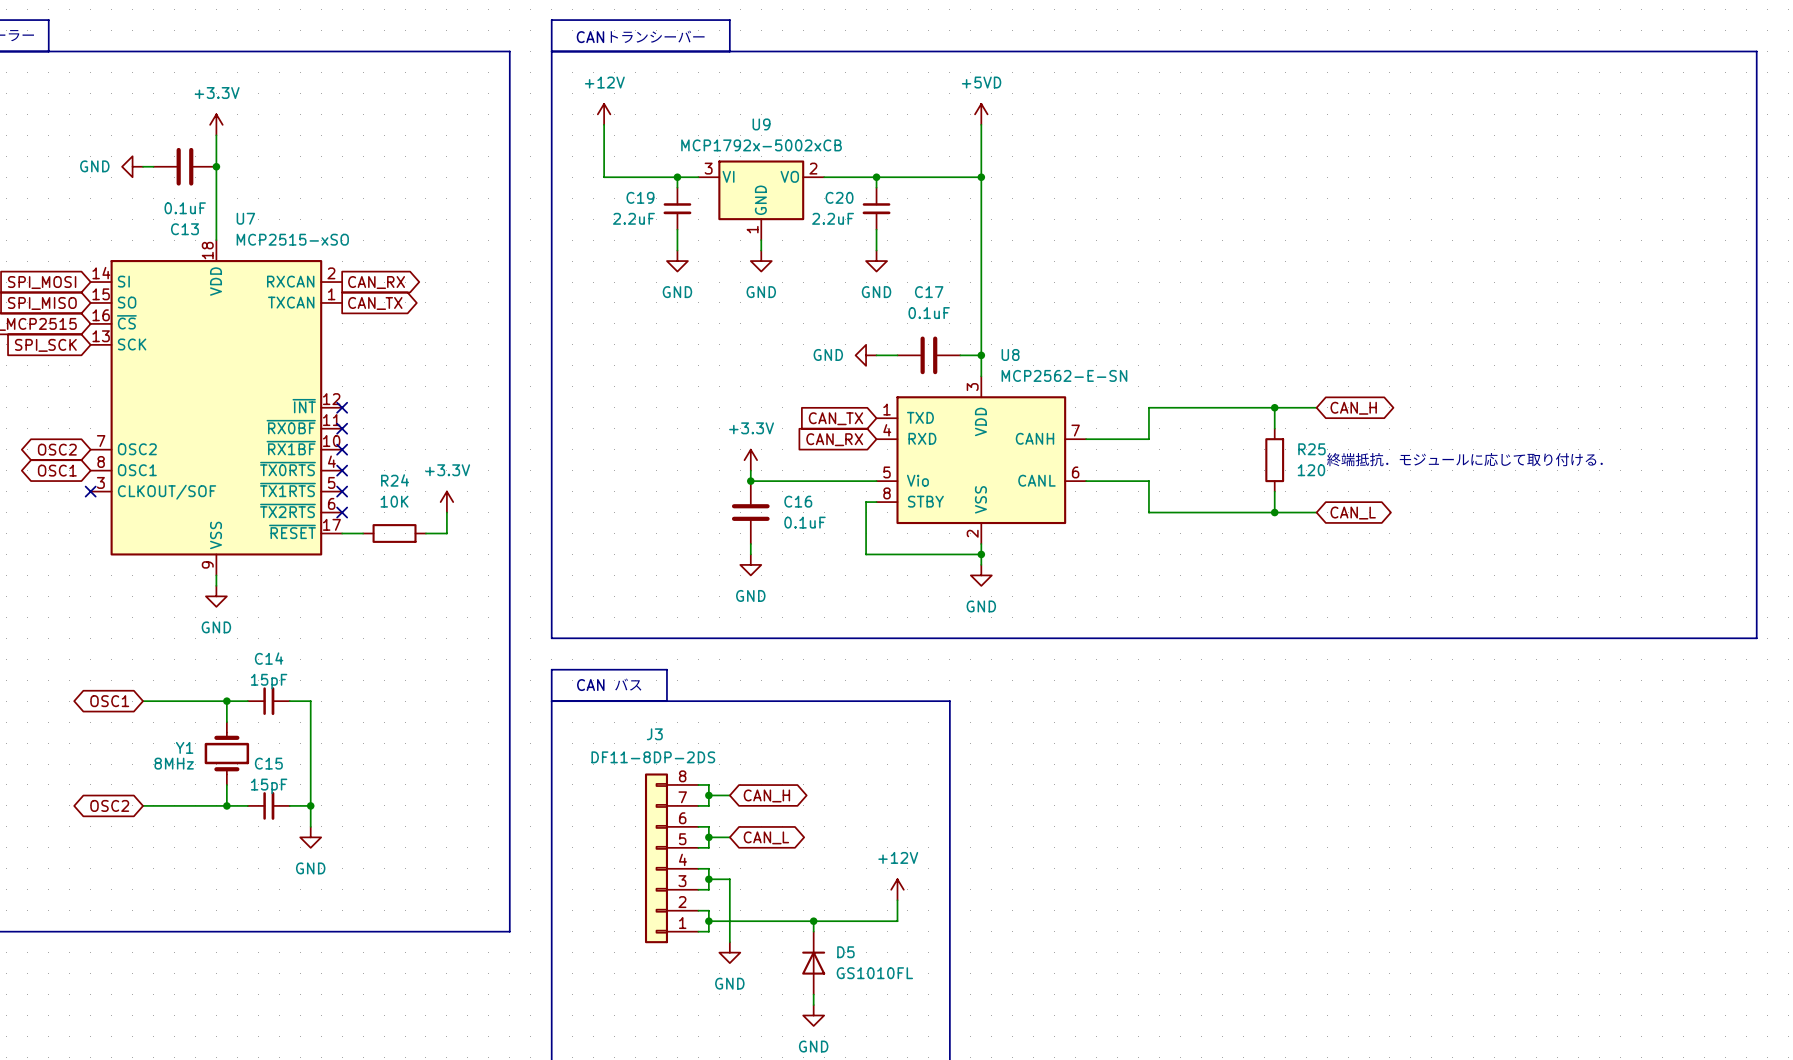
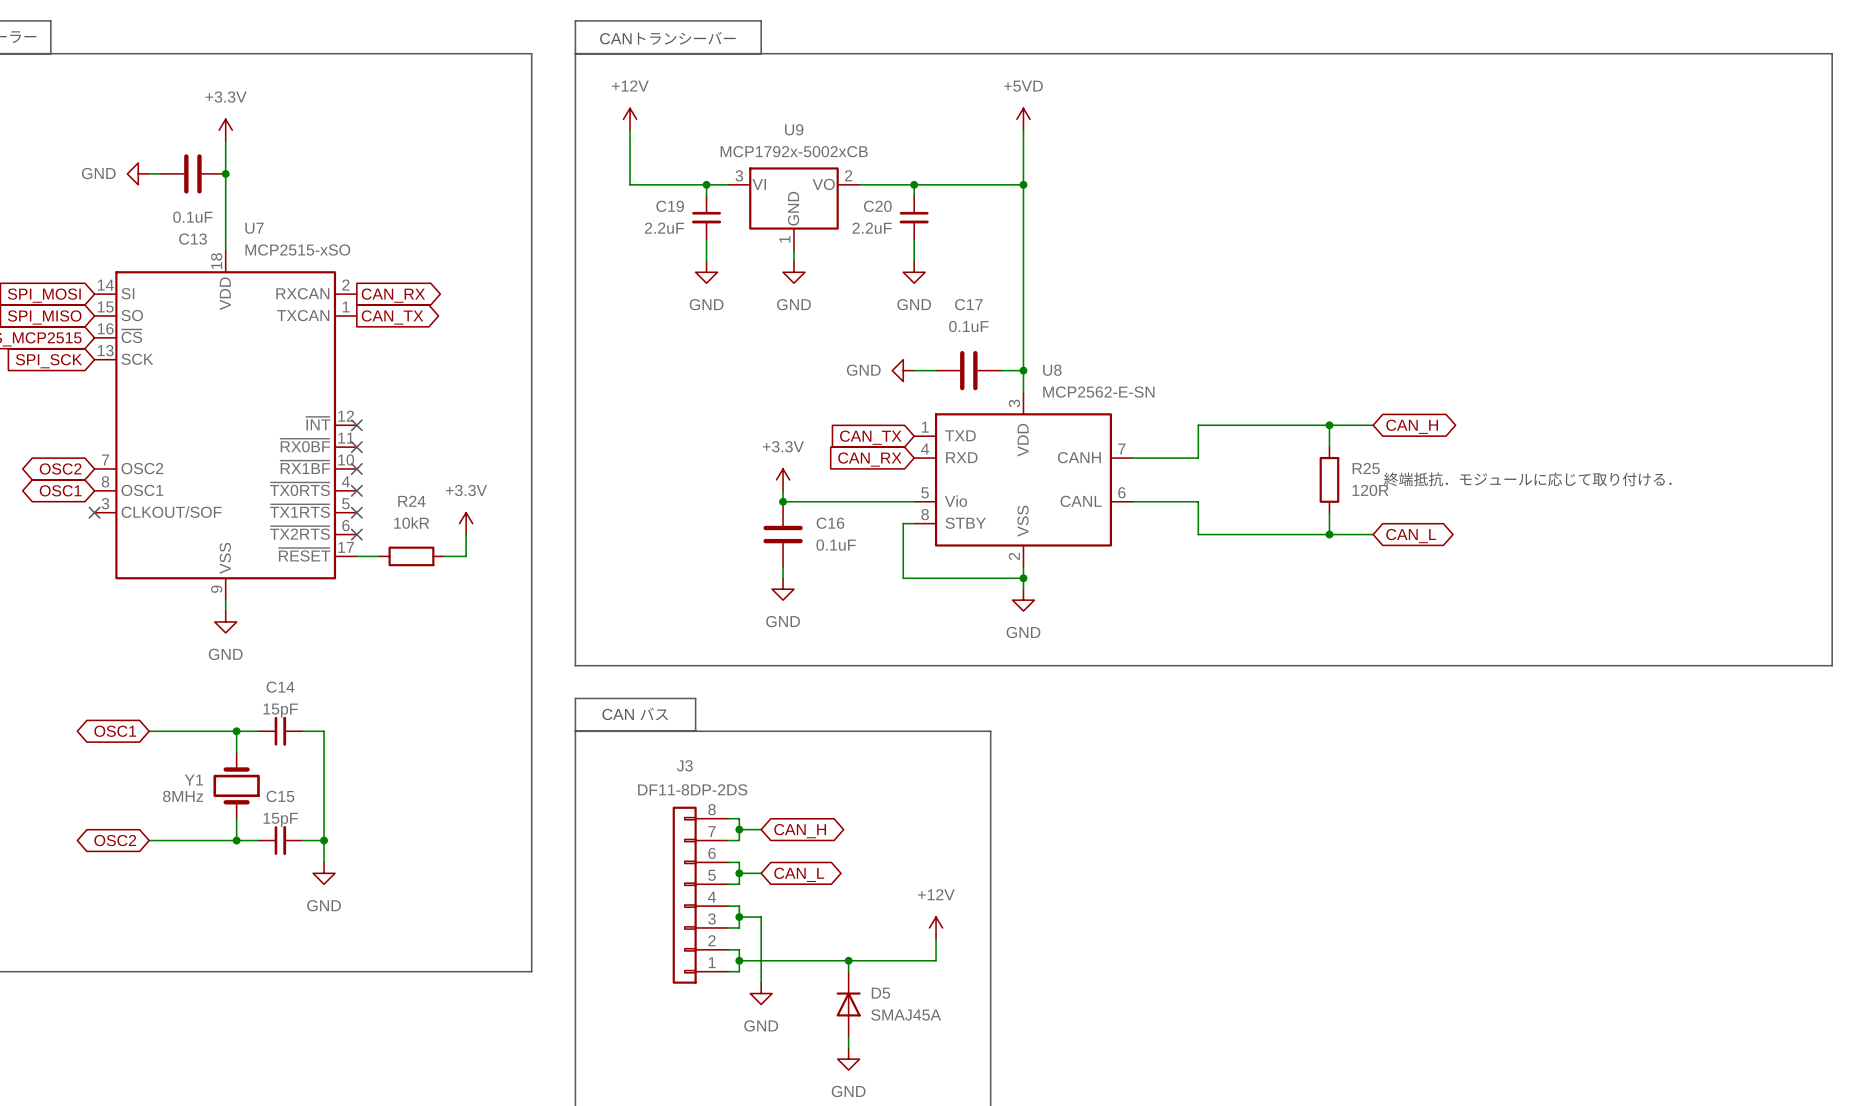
R25 value: 120 (1311, 470) -> 120R (1370, 490)
R24 value: 10K (394, 501) -> 10kR (411, 523)
D5 value: GS1010FL (874, 973) -> SMAJ45A (906, 1014)

